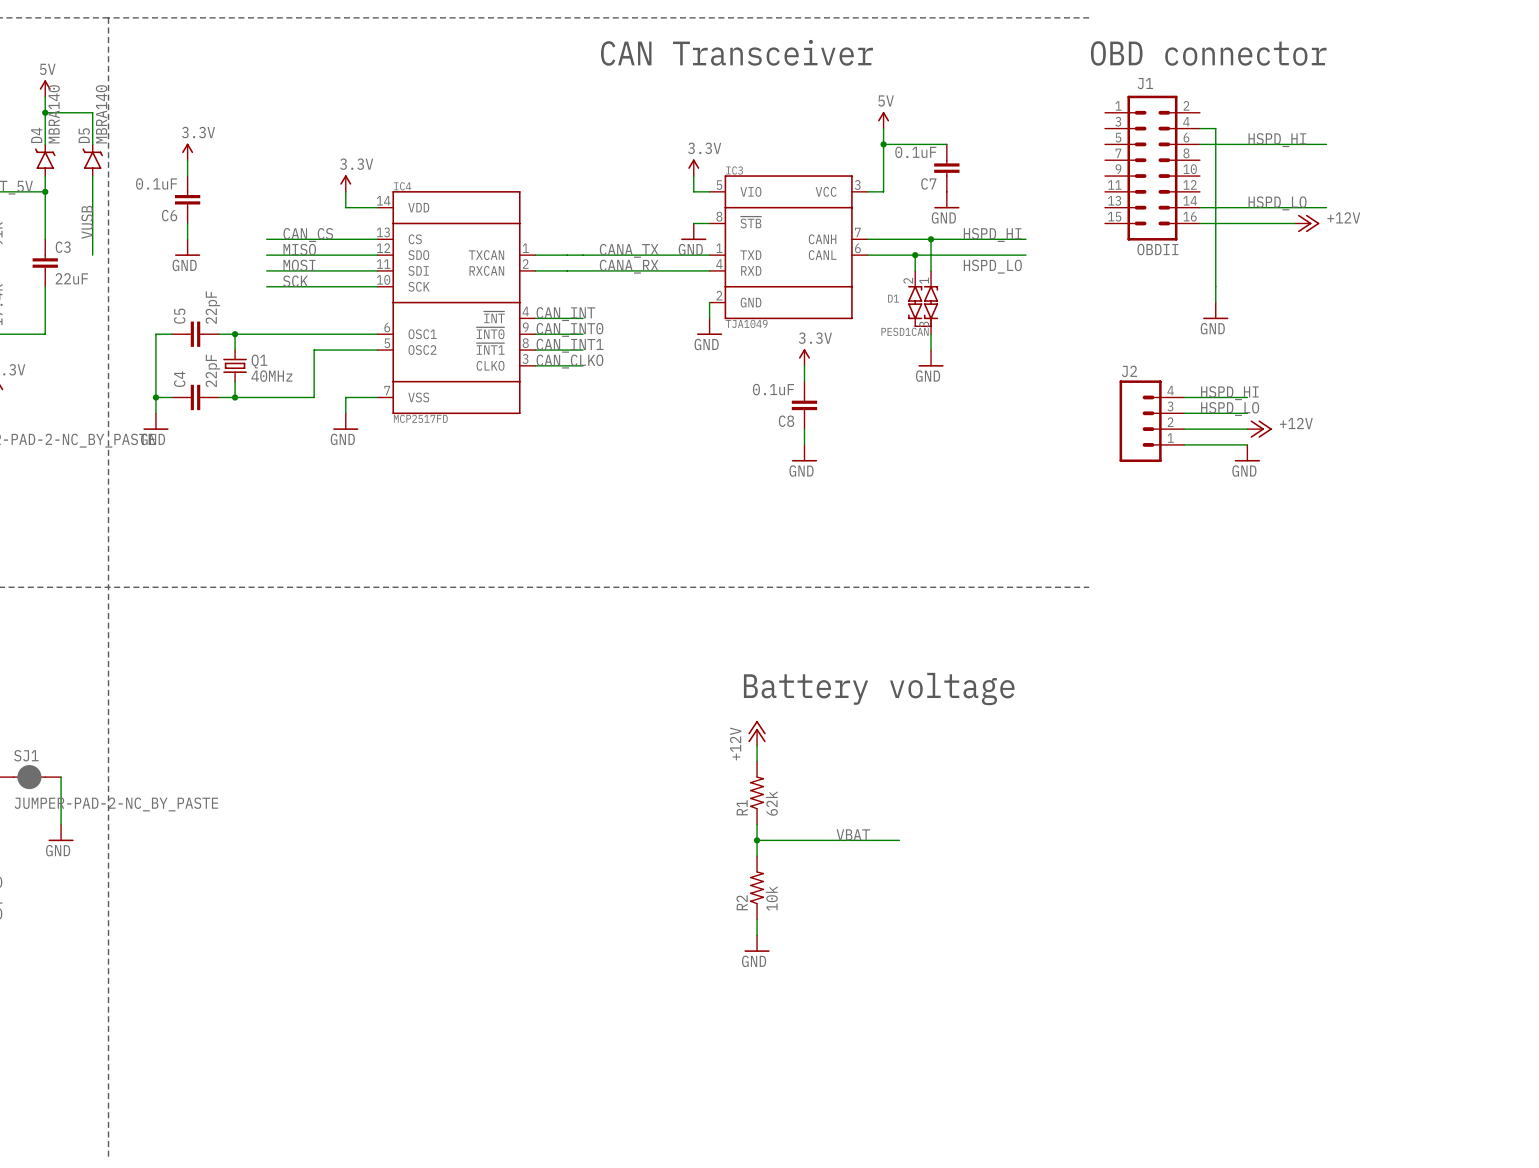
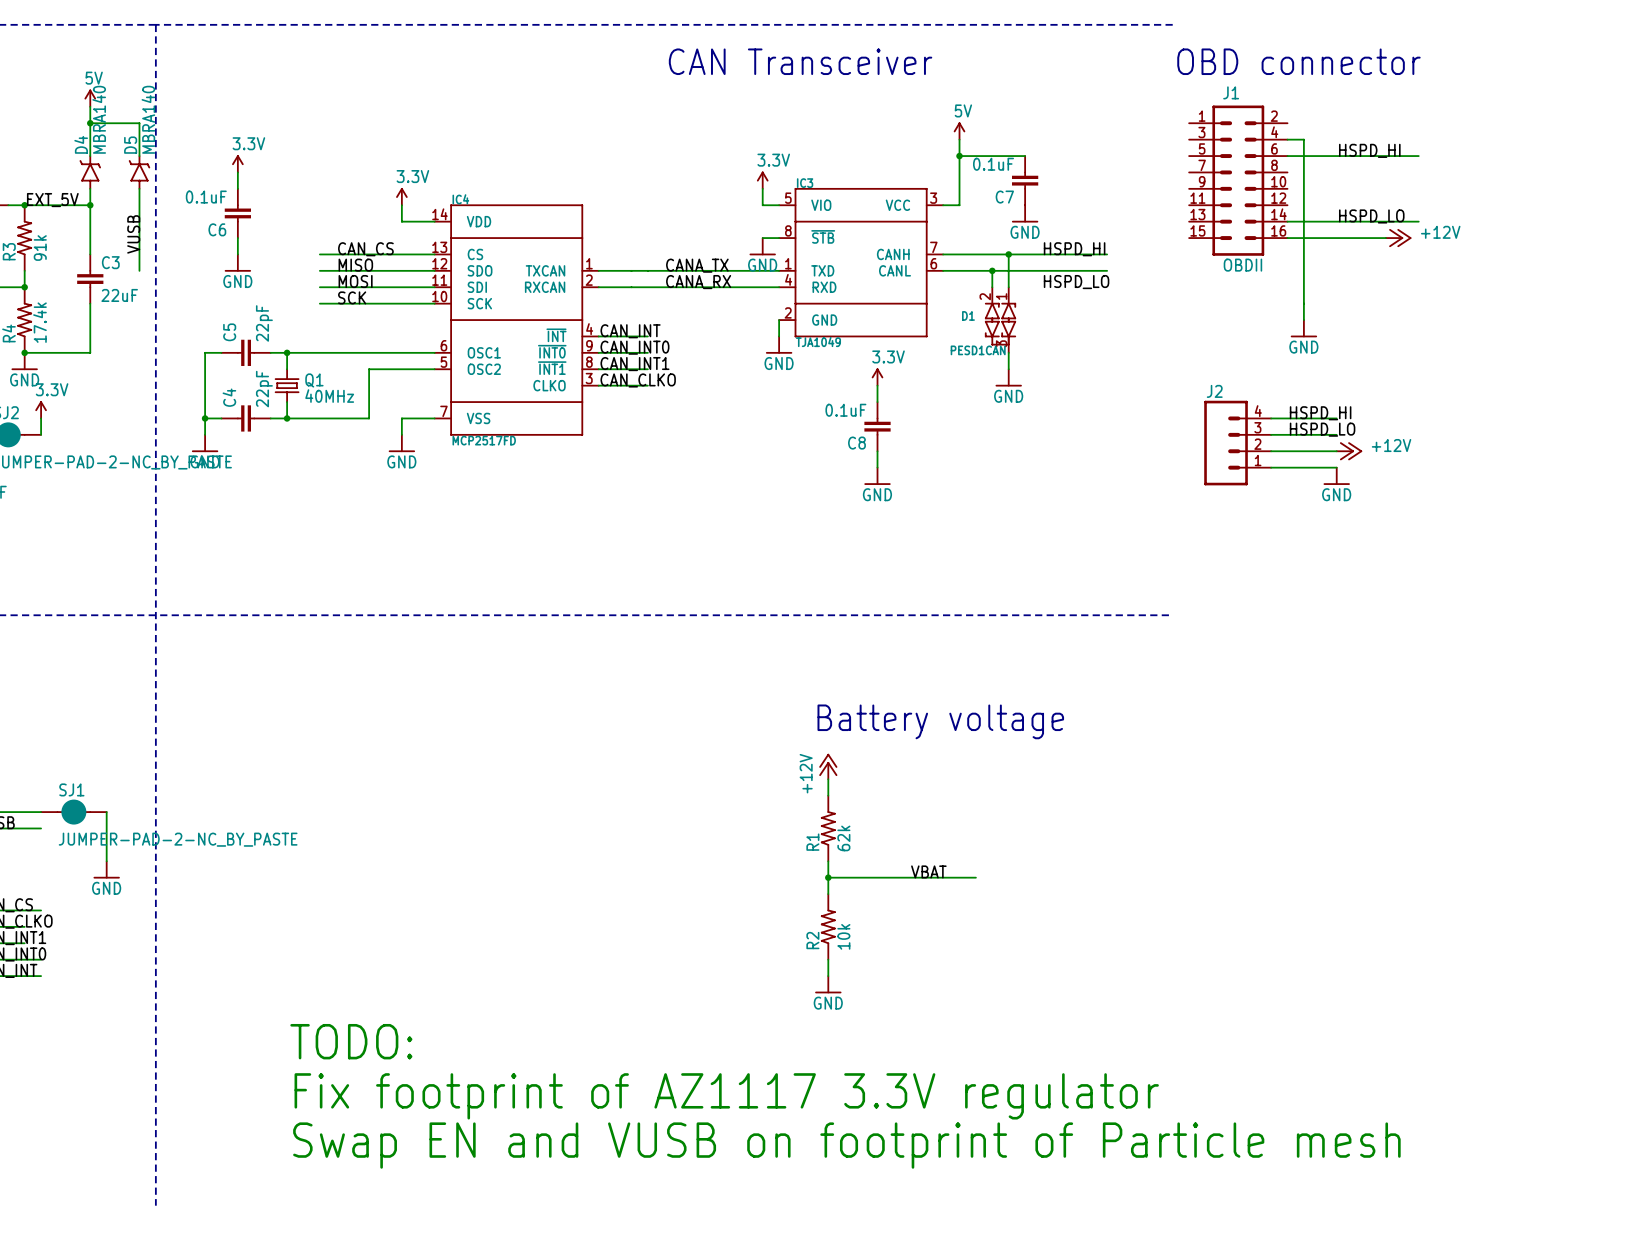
text: none -> TODO: (351, 1041)
text: none -> Fix footprint of AZ1117 3.3V regulator (726, 1096)
text: none -> Swap EN and VUSB on footprint of Particle mesh (846, 1145)

